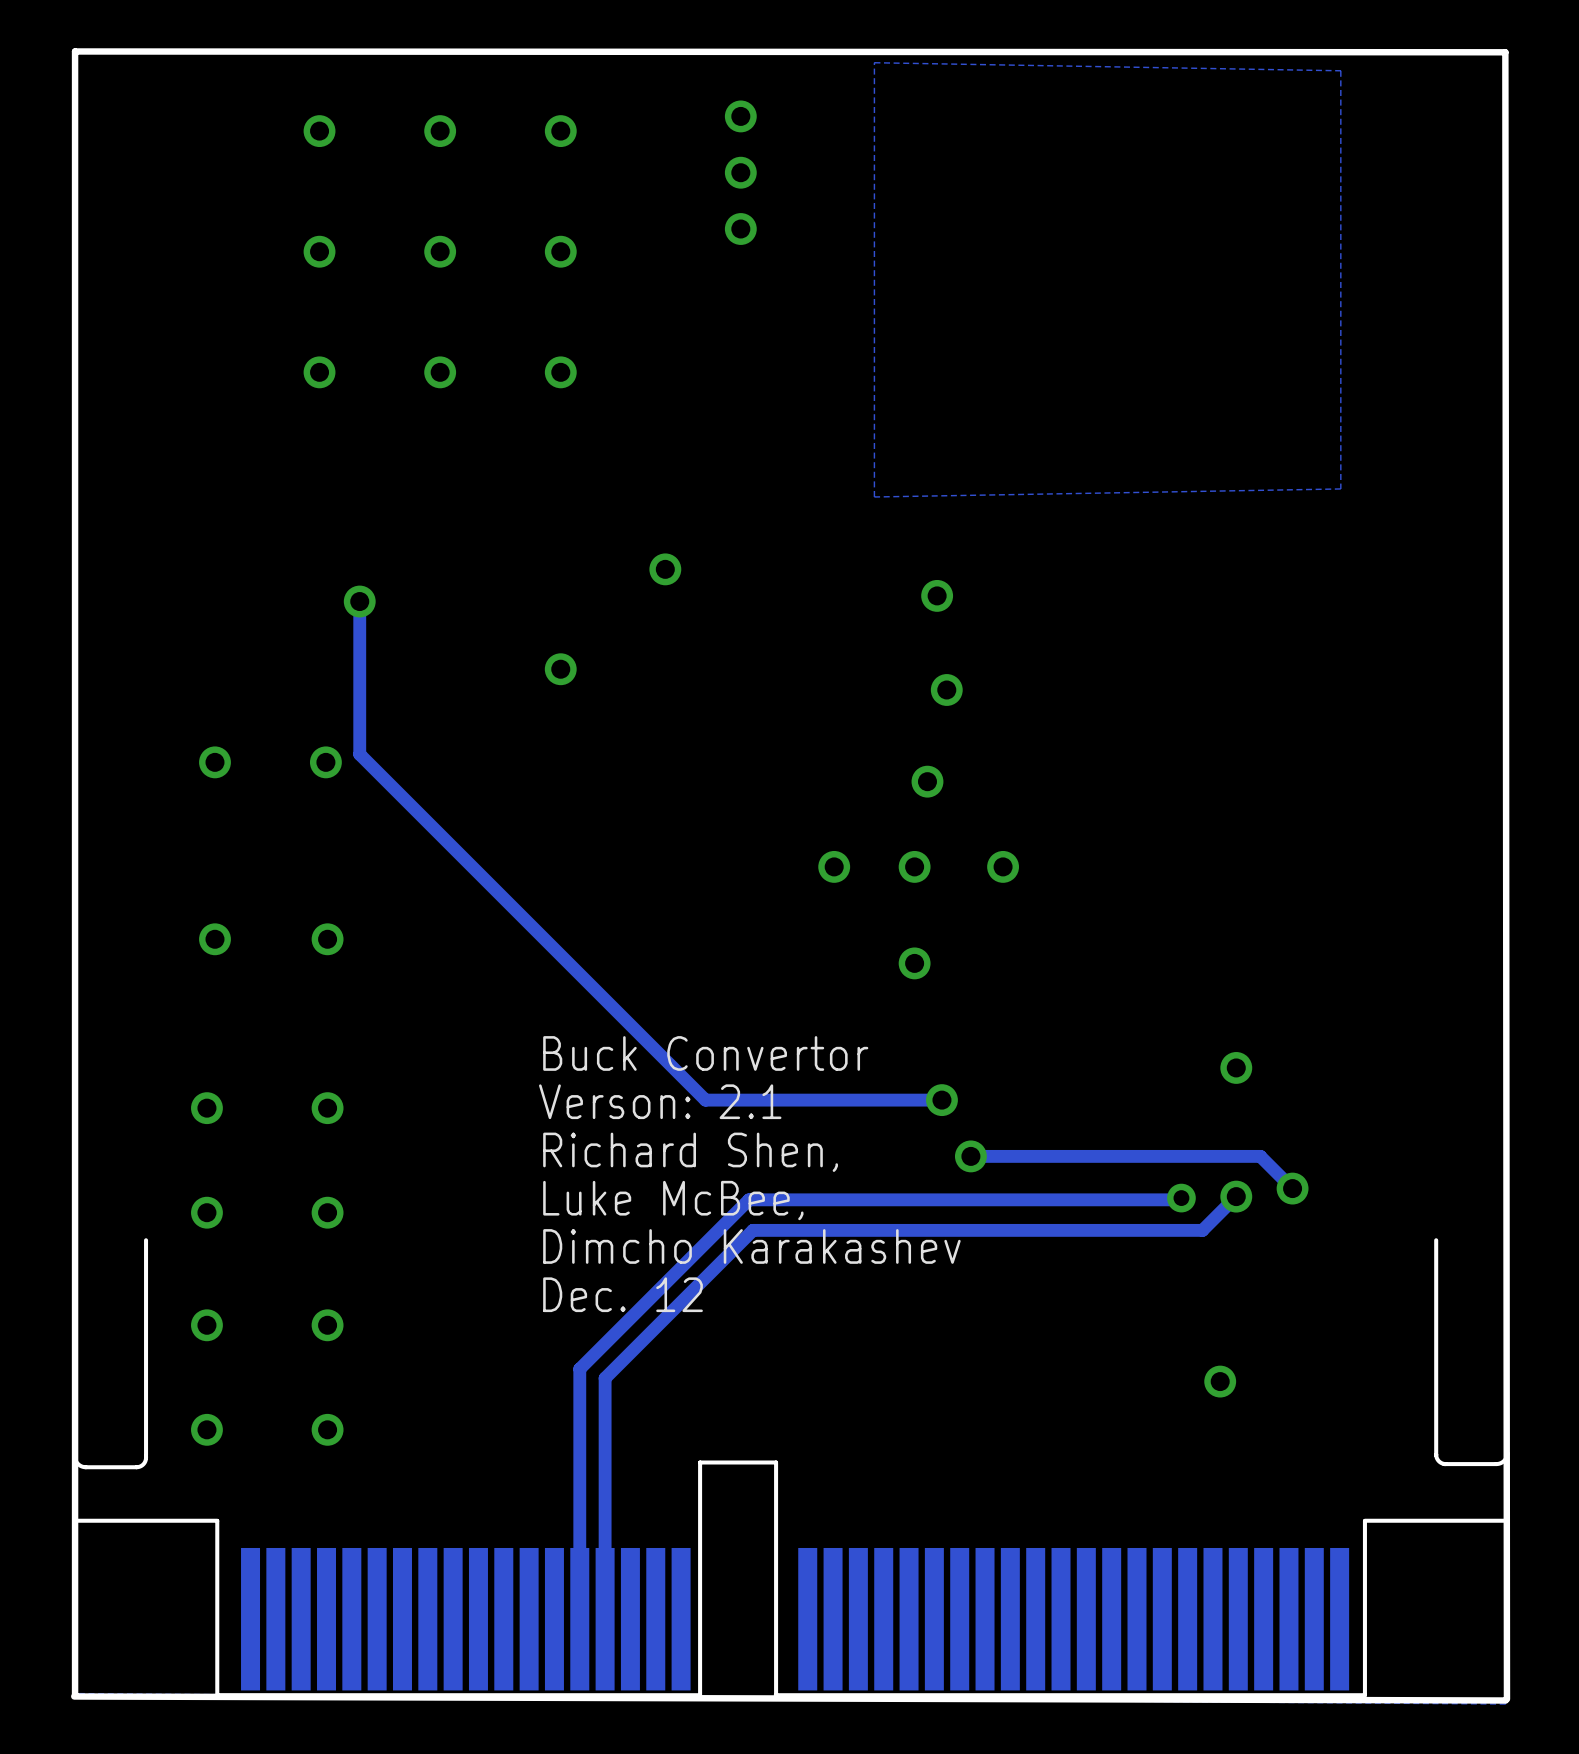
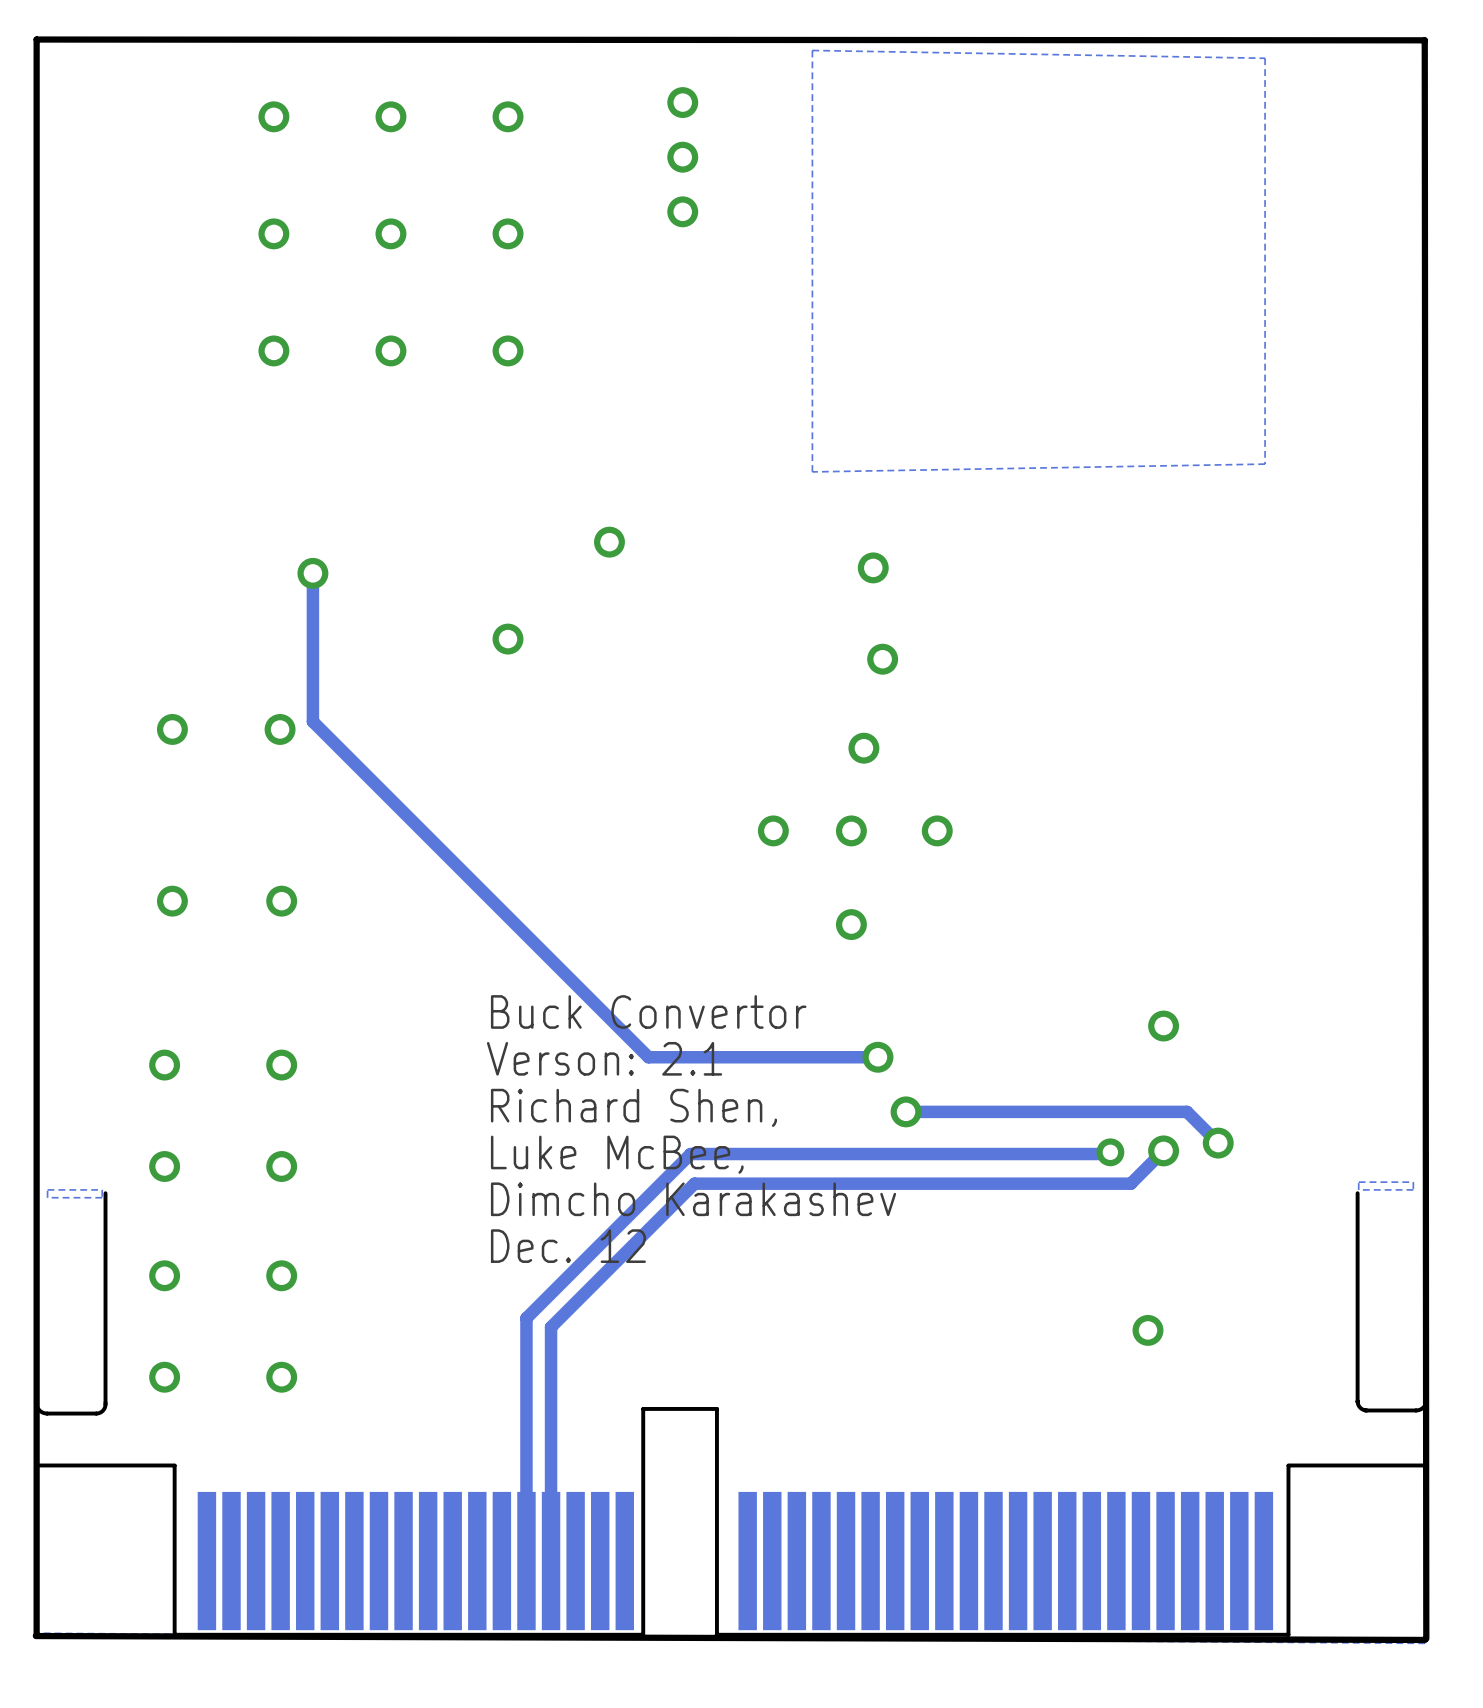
zone outline: none -> (1413, 1182) (1358, 1182) (1358, 1189) (1413, 1189) (1413, 1182)
zone outline: none -> (102, 1189) (47, 1189) (47, 1197) (102, 1197) (102, 1189)

